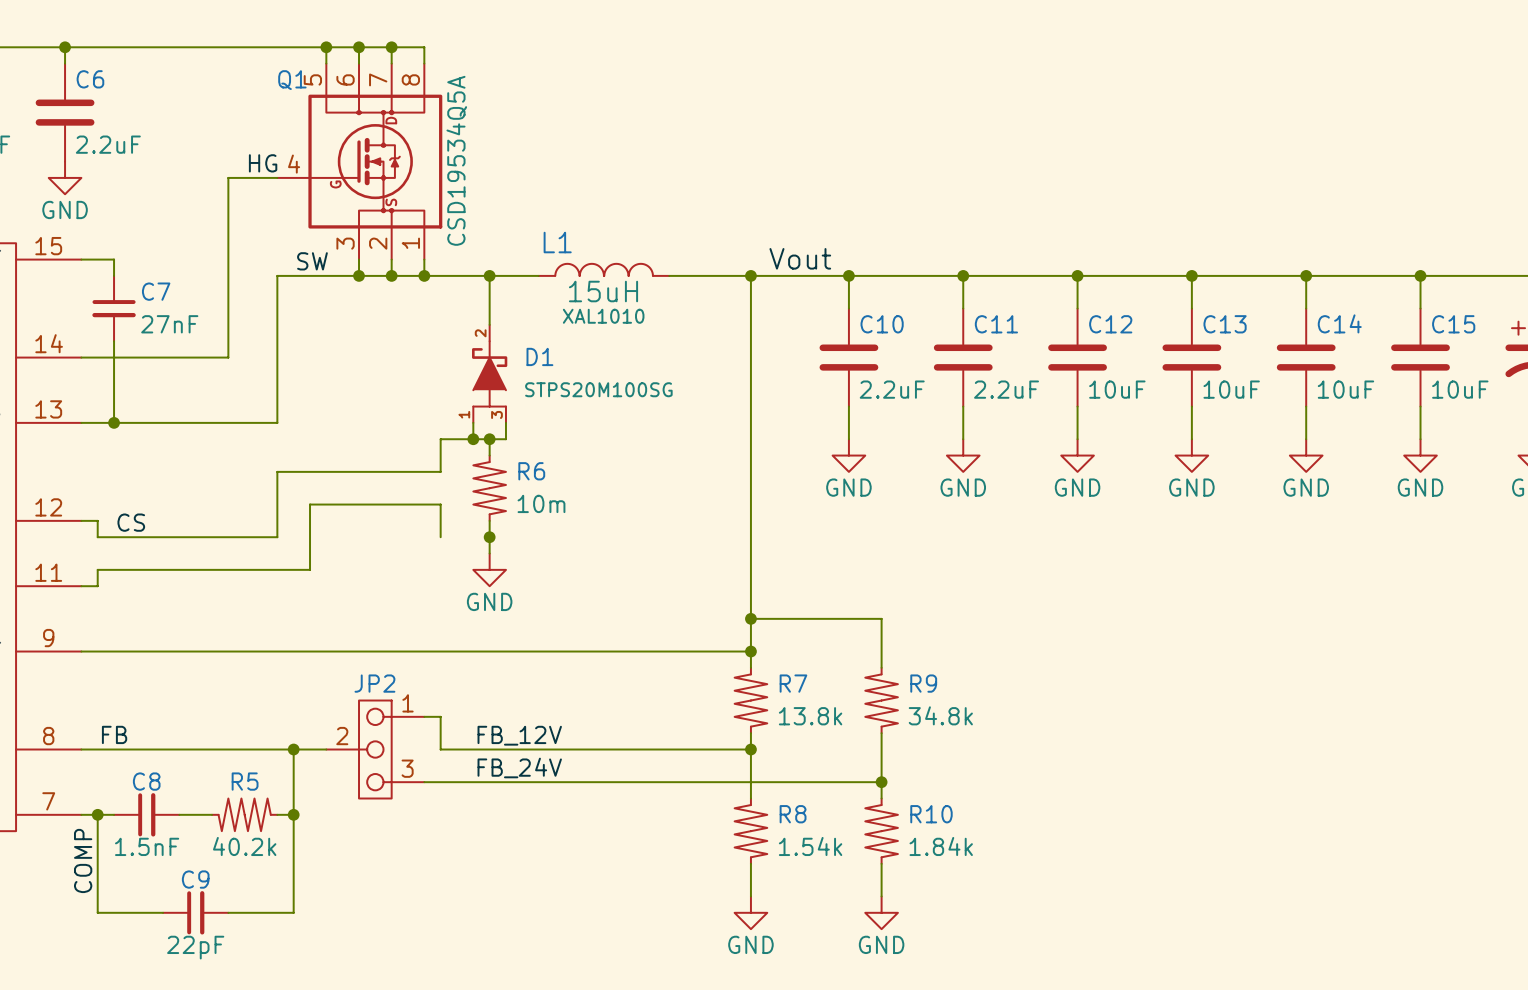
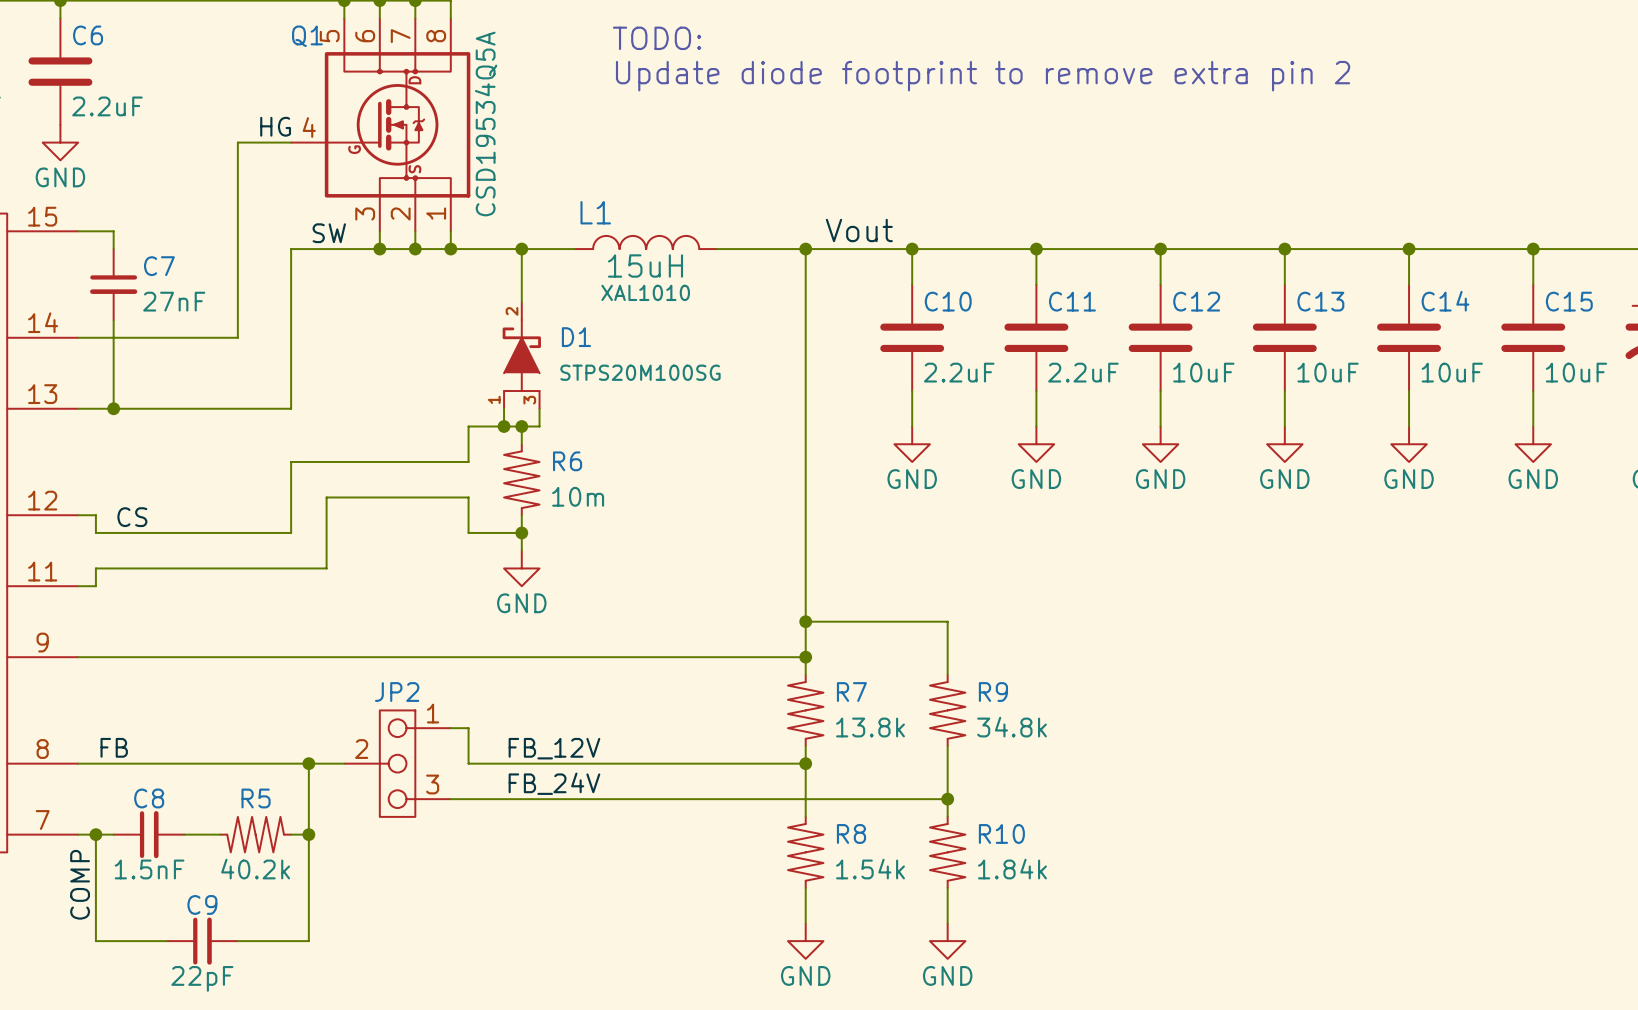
text: none -> TODO: (657, 38)
text: none -> Update diode footprint to remove extra pin 2 (983, 76)
wire: none -> (468, 532) (521, 532)

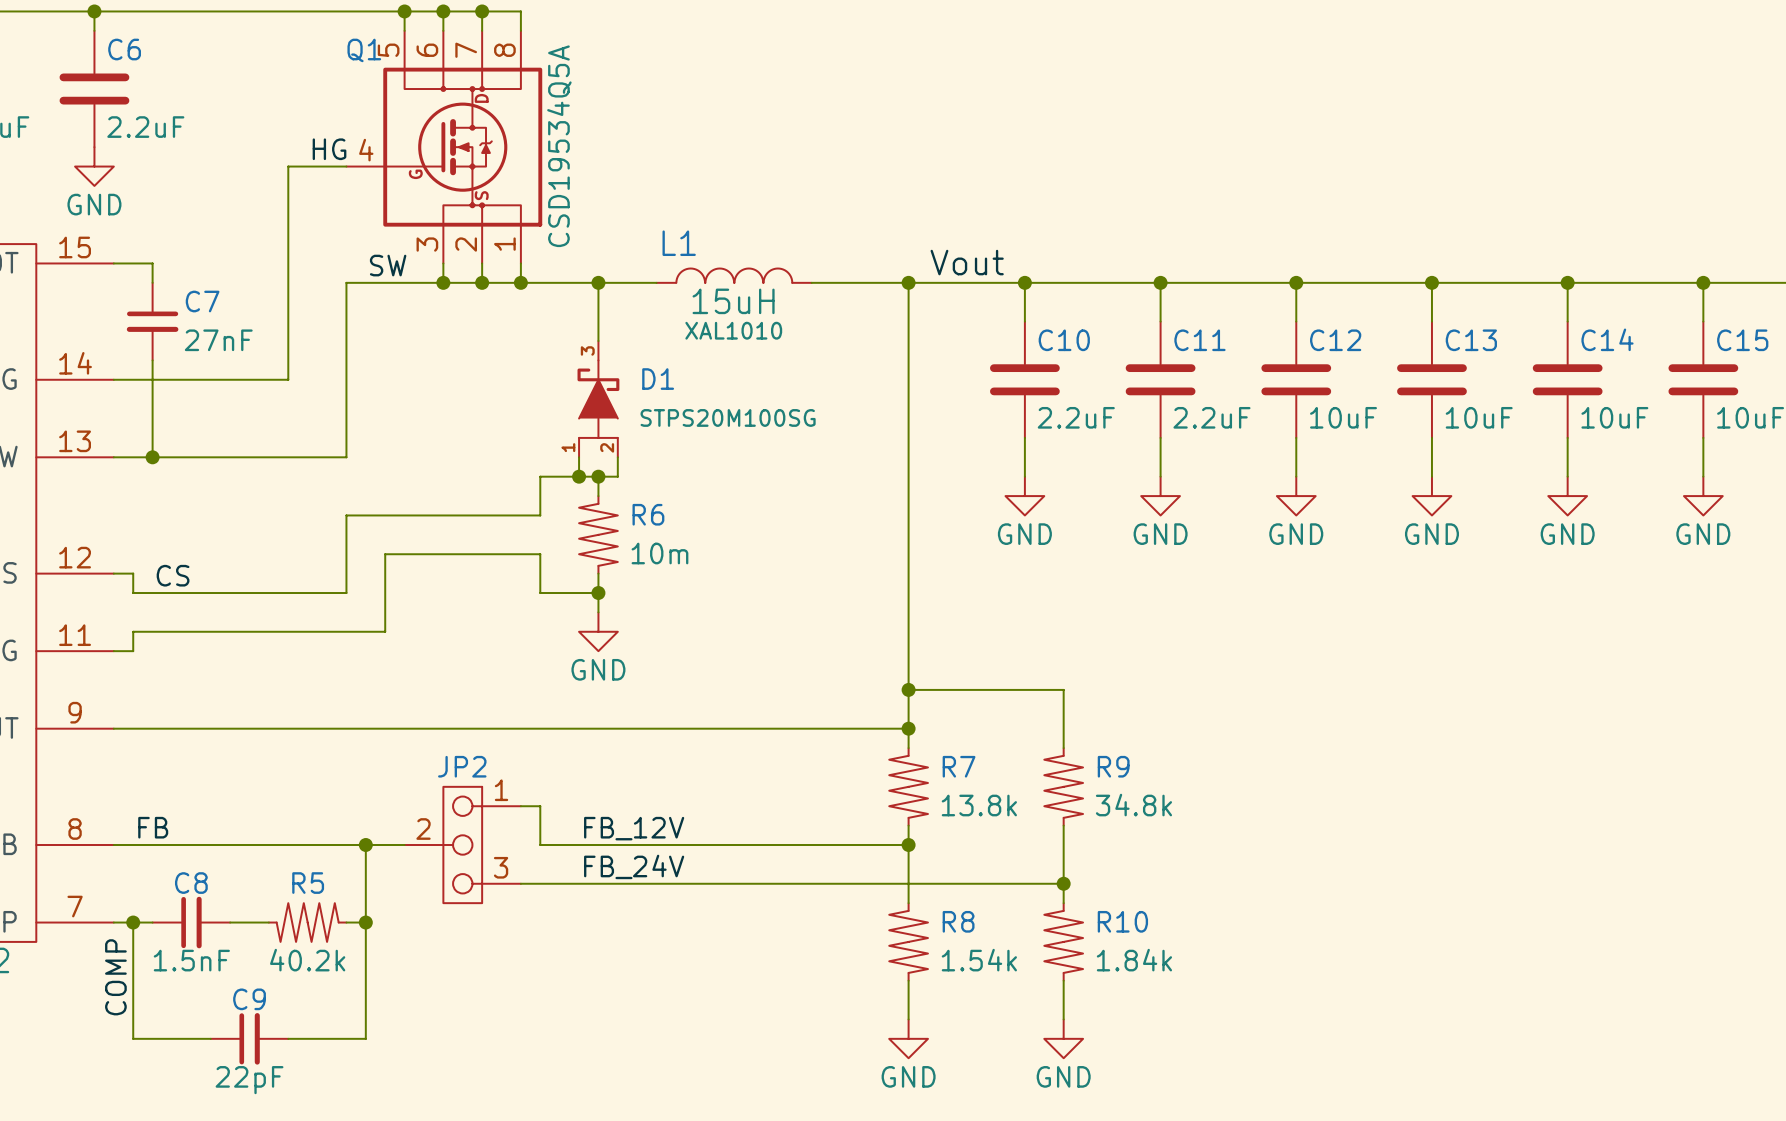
text: TODO: (657, 38) -> none
text: Update diode footprint to remove extra pin 2 (983, 76) -> none
D1 pin number: 2 (512, 311) -> 3 (587, 350)
D1 pin number: 3 (529, 400) -> 2 (607, 447)

